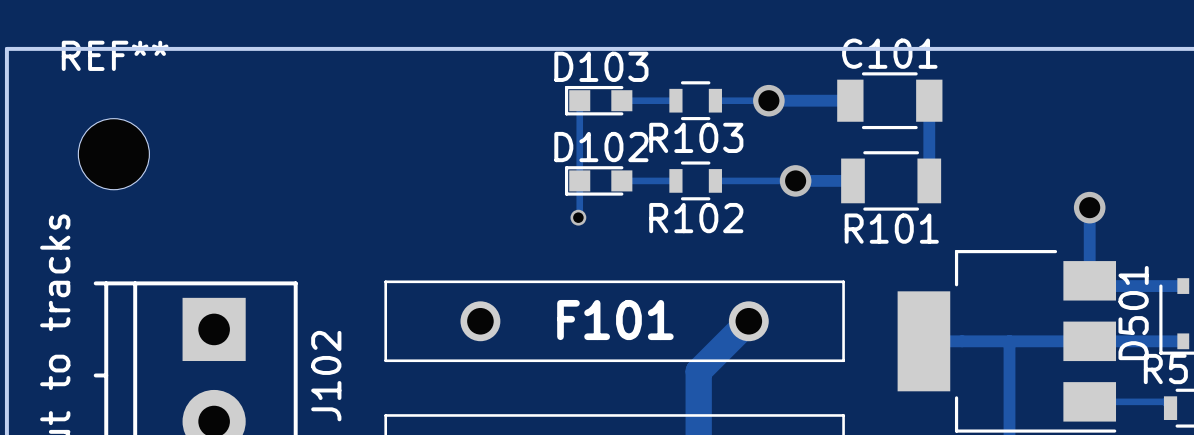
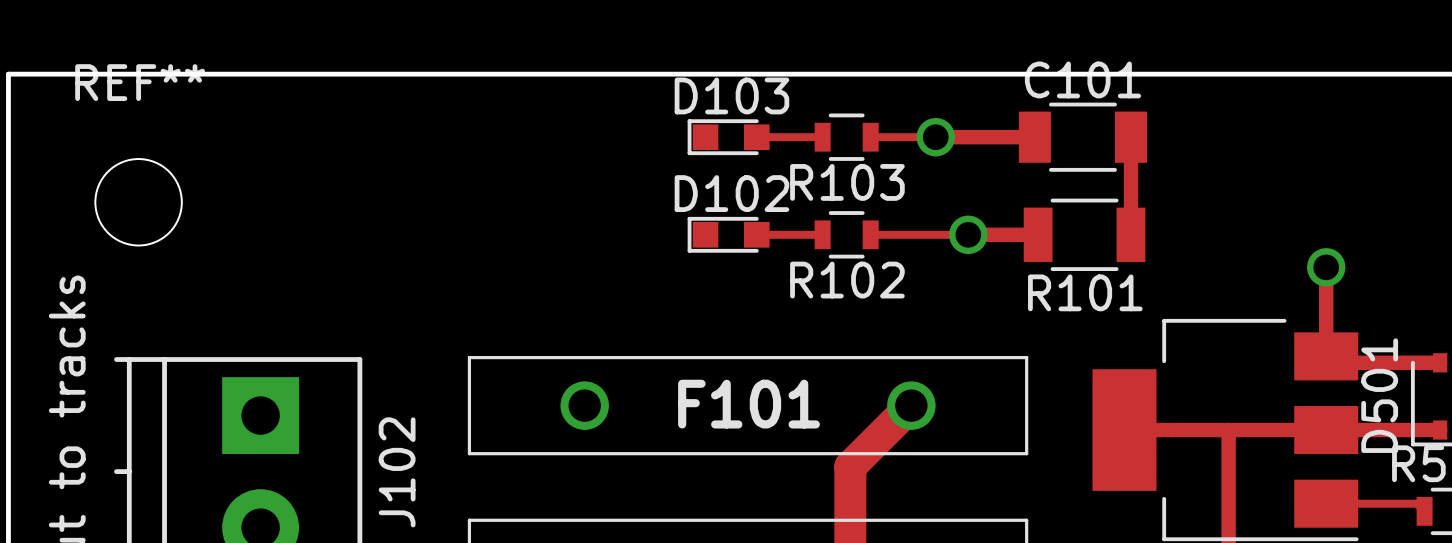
track: (579, 100) (578, 217) -> none
via: (578, 217) -> none

